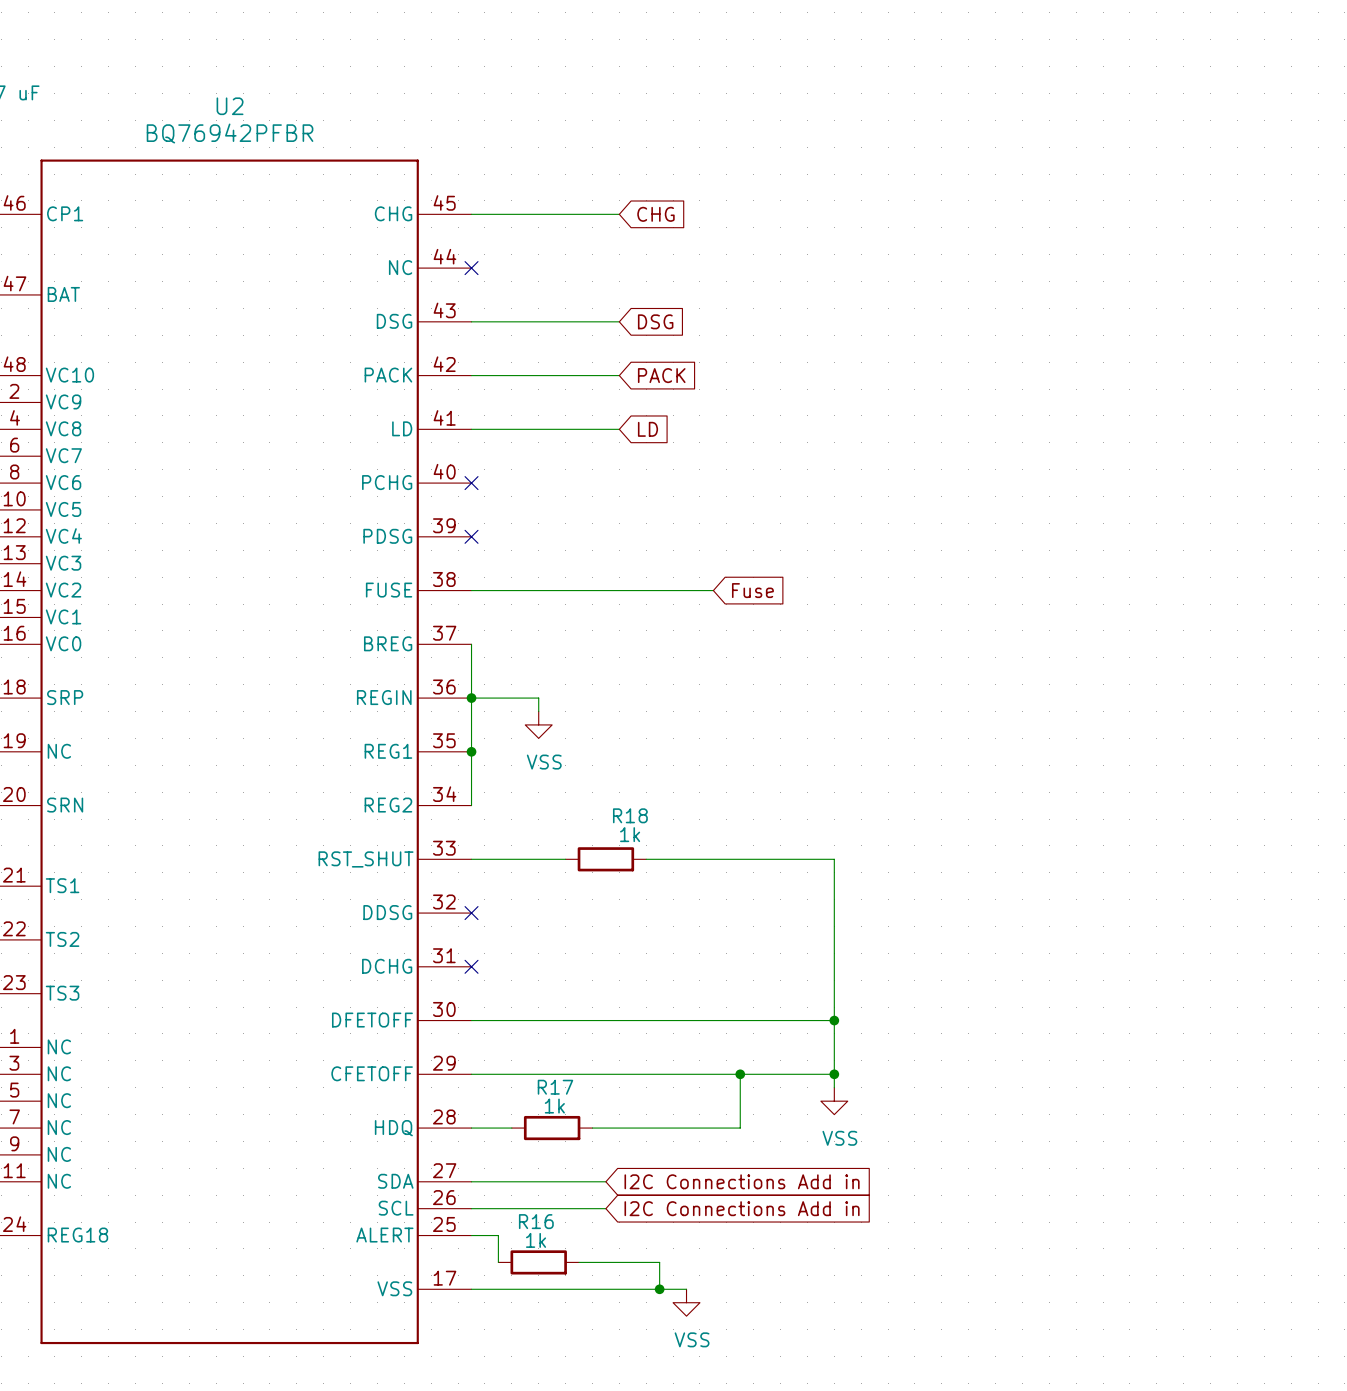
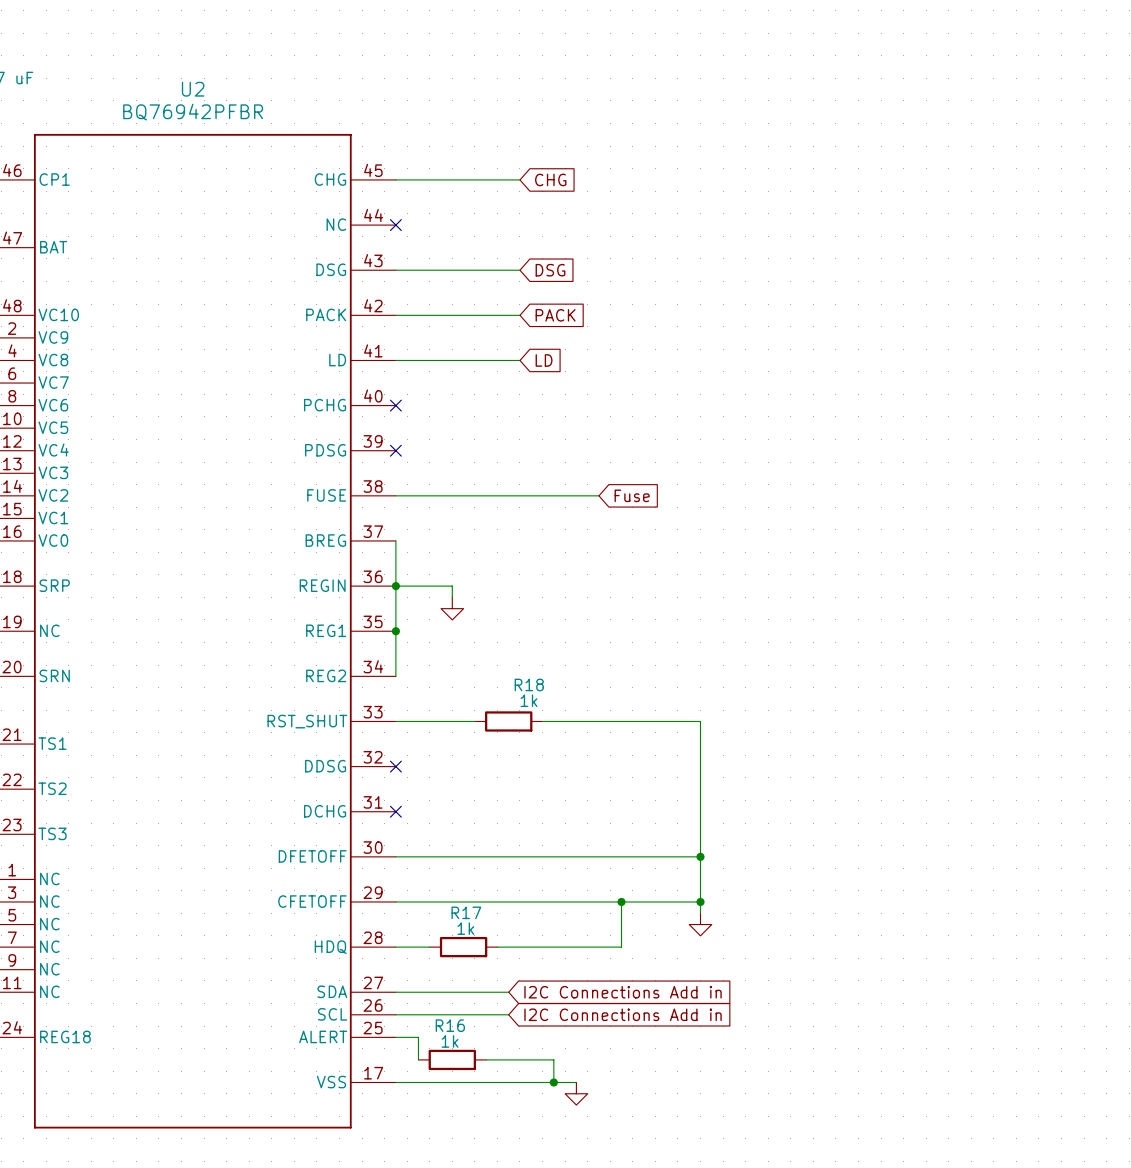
power symbol text: VSS (544, 762) -> none
power symbol text: VSS (839, 1138) -> none
power symbol text: VSS (692, 1339) -> none

